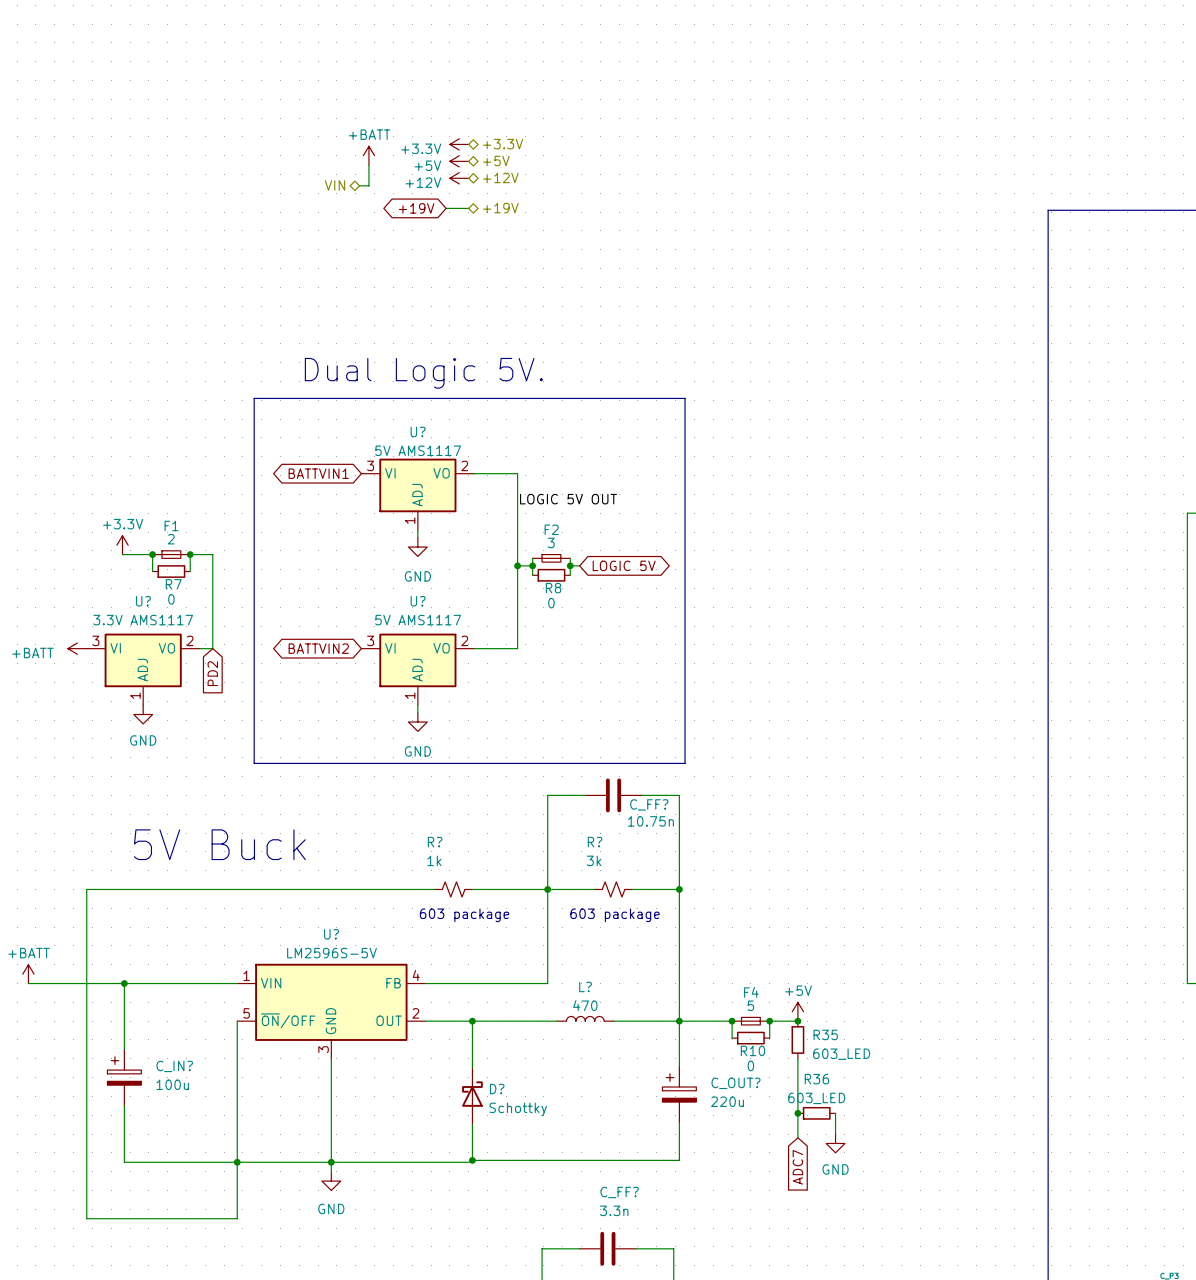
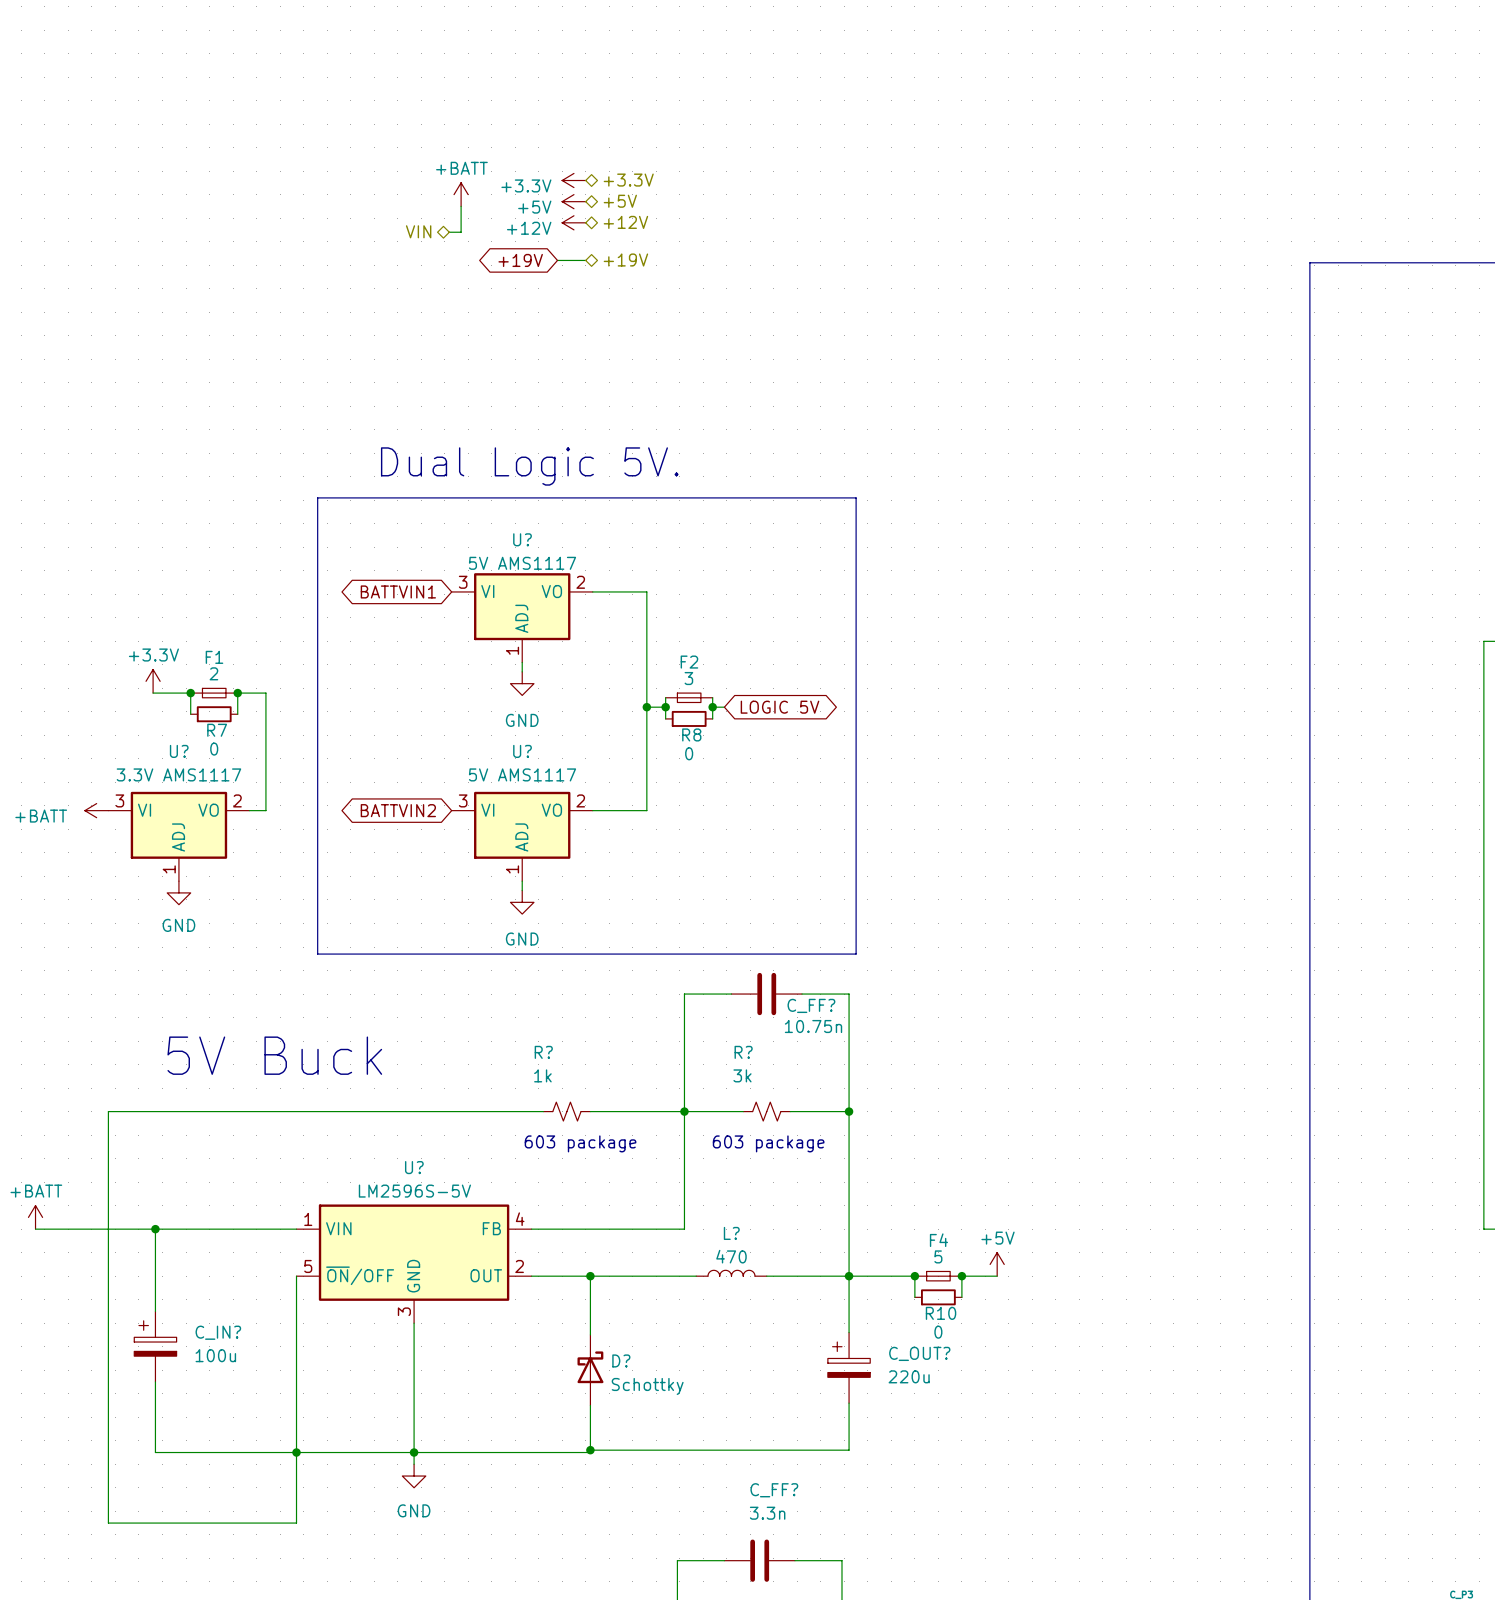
label: LOGIC 5V OUT (568, 499) -> none
global label: PD2 (212, 673) -> none
junction: (797, 1021) -> none
R35: 603_LED (797, 1039) -> none
wire: (797, 1058) (797, 1137) -> none
junction: (797, 1113) -> none
R36: 603_LED (816, 1113) -> none
wire: (835, 1113) (835, 1134) -> none
power symbol: GND (835, 1143) -> none
global label: ADC7 (797, 1167) -> none

